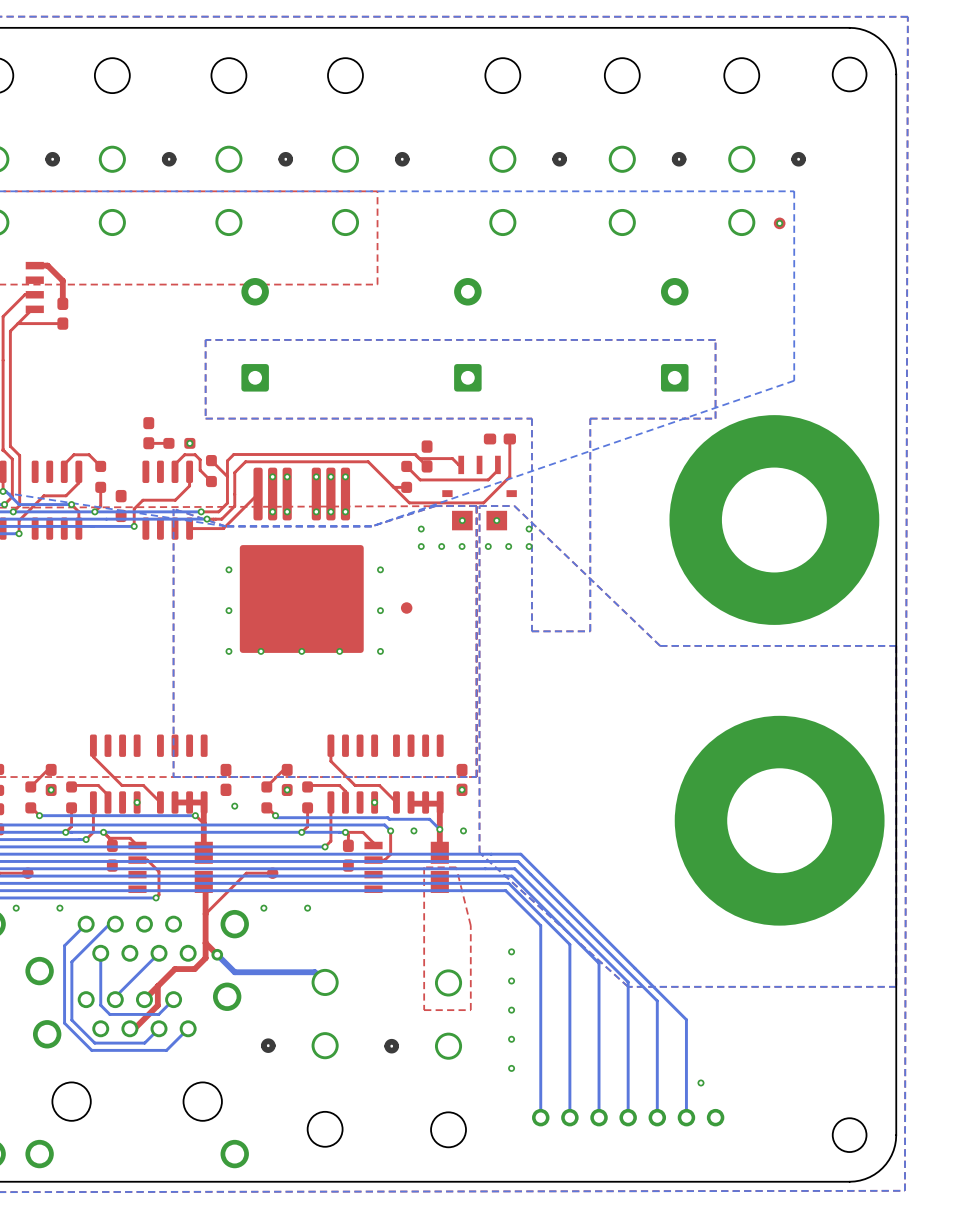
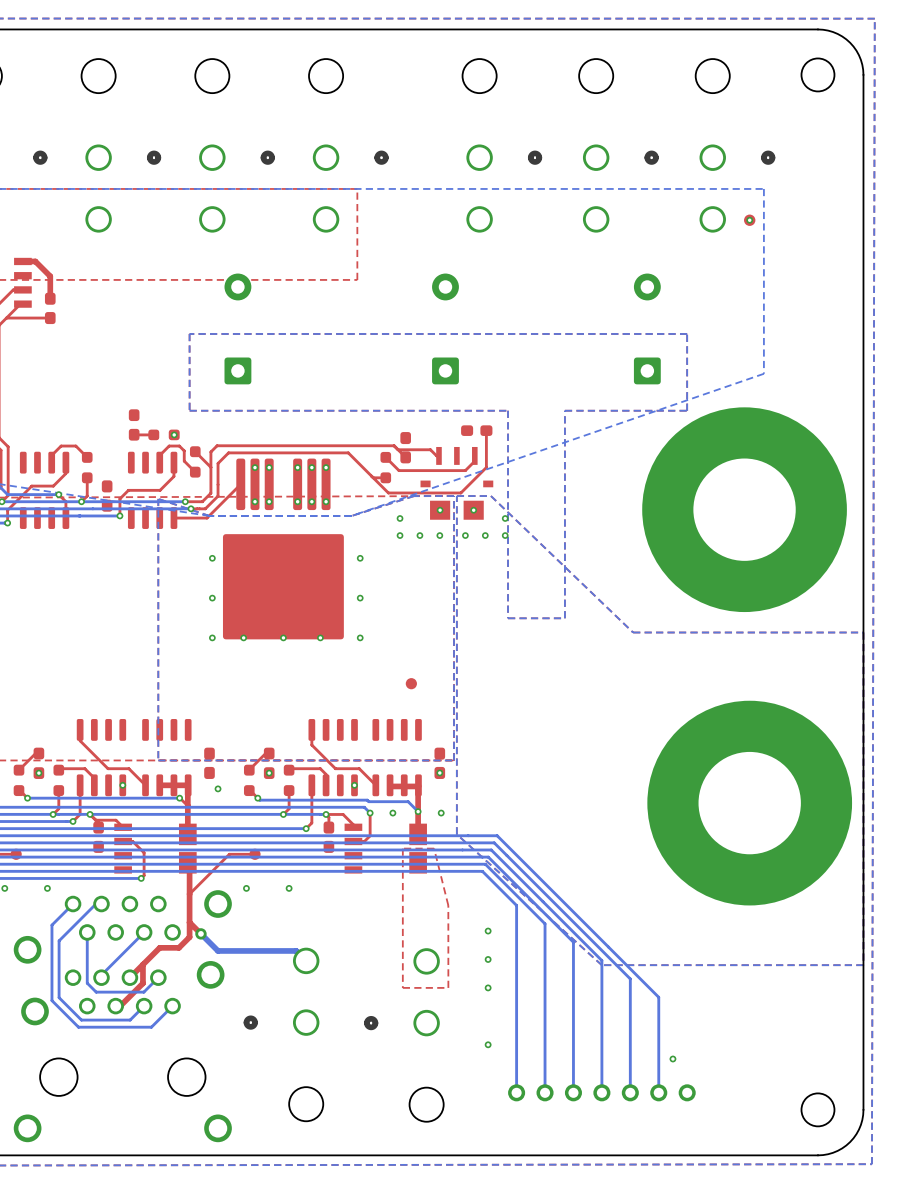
part position: (406, 608) -> (411, 683)
via: (511, 1039) -> none

